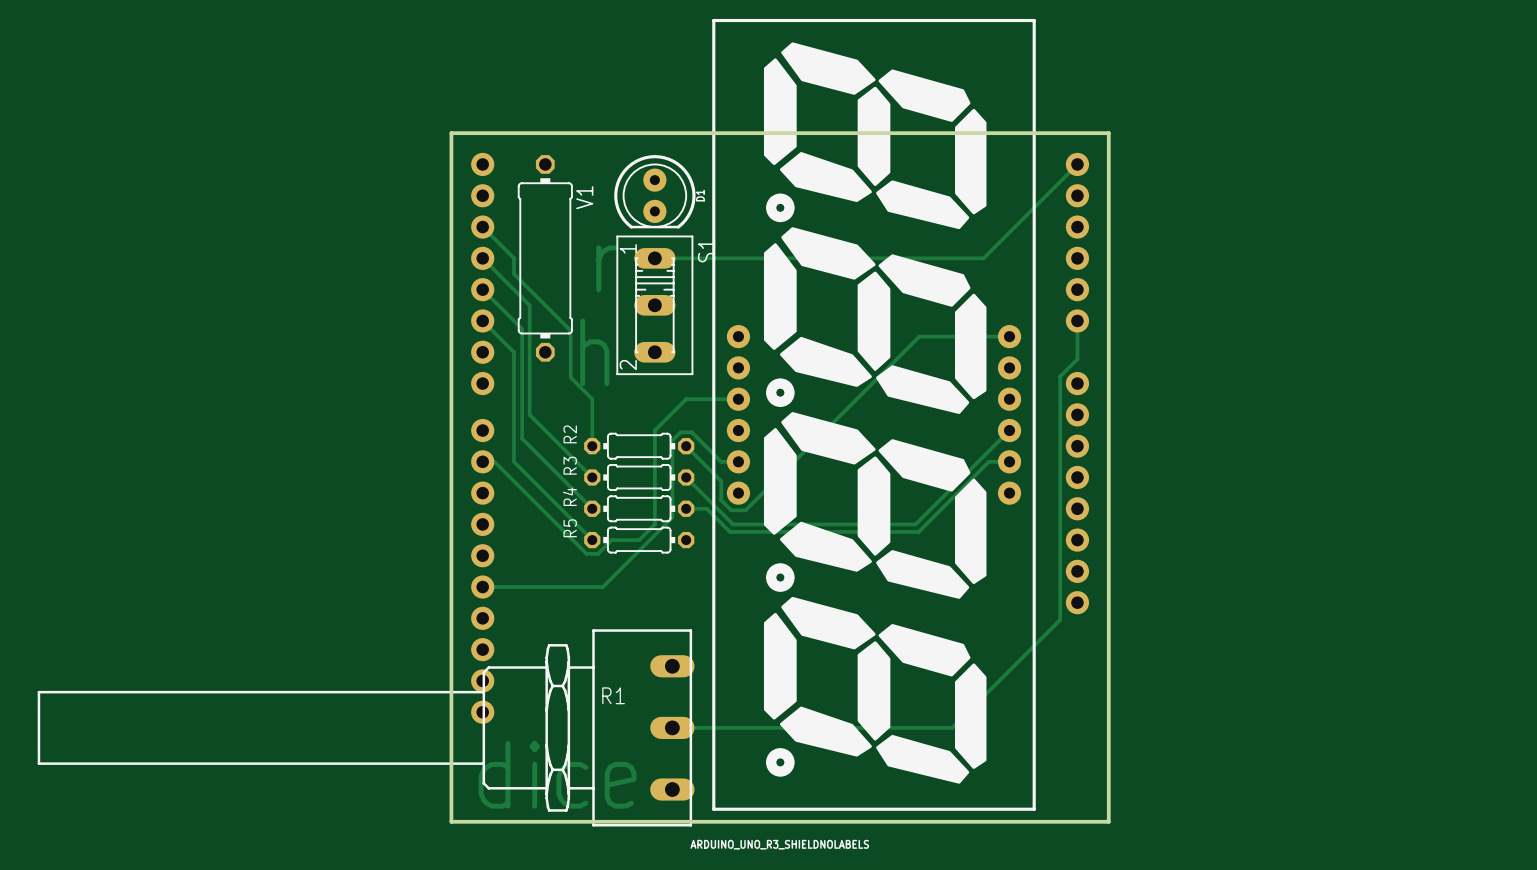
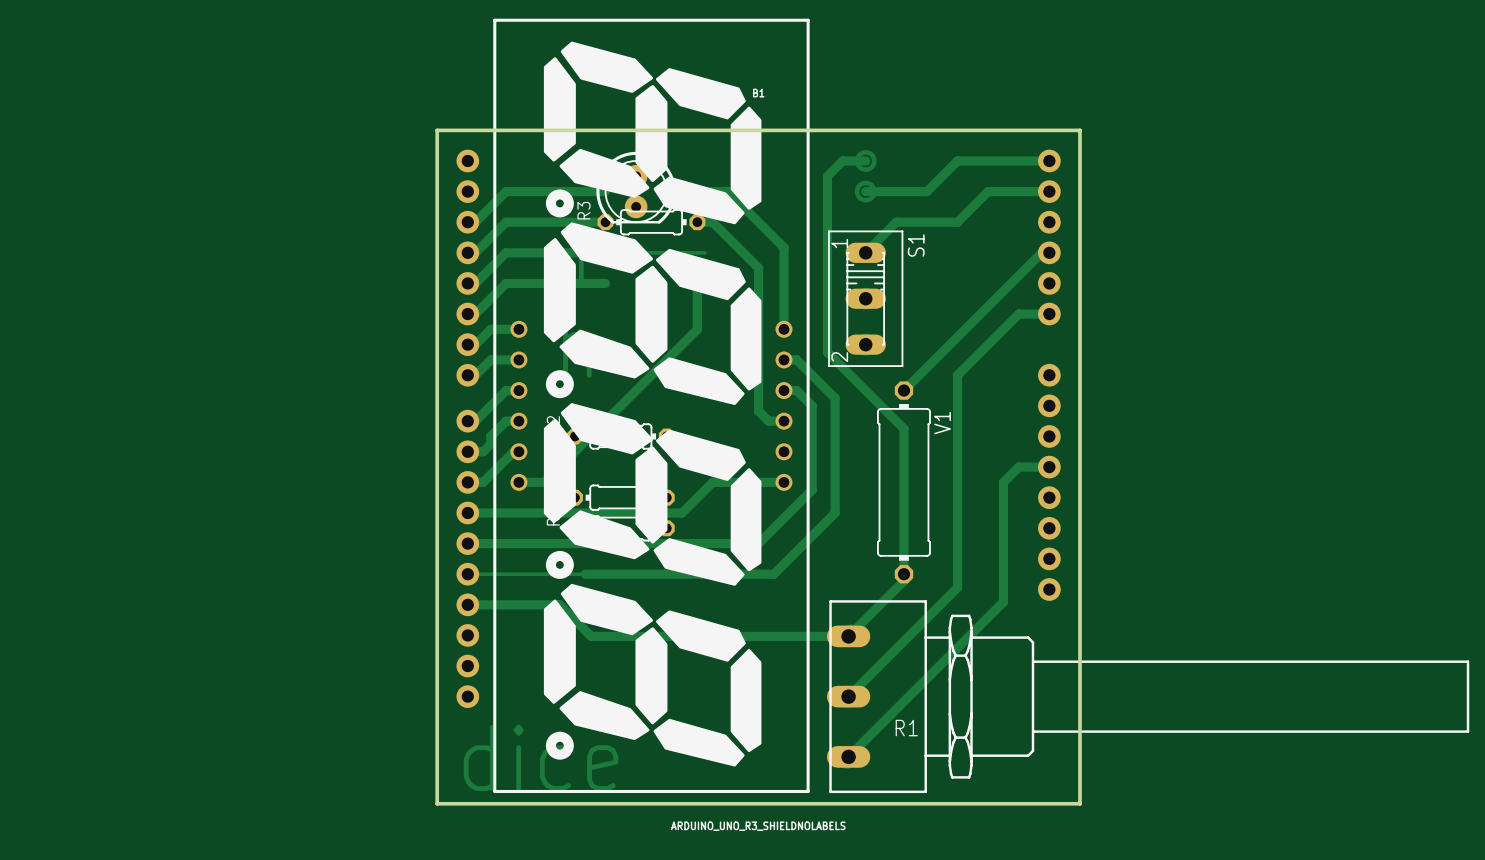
drawing: none -> [854, 150, 877, 203]
track: none -> (865, 160) (842, 160) (827, 176) (827, 352) (903, 428) (903, 581) (848, 636) (591, 636) (559, 604) (467, 604)
track: (1077, 164) (983, 258) (725, 258) -> (1049, 160) (957, 160) (926, 191) (865, 191)
track: none -> (697, 191) (727, 191) (784, 247) (784, 329)
track: none -> (1049, 191) (988, 191) (957, 222) (896, 222) (865, 252)
track: (482, 227) (514, 258) (514, 274) (570, 330) (570, 377) (592, 399) (592, 446) -> (467, 222) (475, 222) (506, 191) (605, 191)
track: none -> (697, 222) (712, 222) (758, 268) (758, 411) (768, 421) (784, 421)
track: (482, 258) (529, 305) (529, 414) (592, 477) -> (467, 252) (475, 252) (506, 222) (605, 222)
V1 position: (545, 258) -> (903, 482)
track: none -> (1049, 252) (1041, 252) (903, 390)
track: (482, 289) (522, 329) (522, 438) (592, 508) -> (467, 283) (475, 283) (506, 252) (605, 252)
track: none -> (697, 283) (697, 329) (544, 482) (518, 482)
S1 position: (654, 305) -> (865, 298)
track: (482, 320) (514, 352) (514, 461) (592, 540) -> (467, 314) (475, 314) (506, 283) (605, 283)
track: (1077, 320) (1077, 359) (1060, 376) (1060, 619) (952, 727) (672, 727) -> (1049, 314) (1018, 314) (957, 375) (957, 587) (848, 696)
track: none -> (518, 329) (490, 329) (475, 344) (467, 344)
track: (1009, 336) (919, 336) (745, 510) (731, 510) (721, 500) (721, 481) (686, 446) -> none
track: none -> (518, 359) (490, 359) (475, 375) (467, 375)
track: none -> (518, 390) (506, 390) (475, 421) (467, 421)
track: (738, 399) (686, 399) (654, 430) (654, 524) (639, 540) (611, 540) (597, 553) (586, 553) (494, 461) -> (518, 421) (506, 421) (490, 436) (490, 444) (483, 451) (479, 451)
track: none -> (784, 390) (796, 390) (812, 405) (812, 490) (758, 543) (467, 543)
part: none -> (651, 405)
part: (873, 414) -> none
track: (1009, 430) (915, 524) (733, 524) (686, 477) -> none
track: none -> (518, 451) (513, 451) (483, 482) (467, 482)
track: (738, 461) (721, 461) (691, 432) (680, 432) (672, 440) (672, 517) (602, 587) -> (784, 359) (796, 359) (835, 398) (835, 512) (773, 574) (585, 574)
track: (1009, 461) (988, 461) (918, 531) (730, 531) (706, 508) (686, 508) -> none
R3 position: (639, 477) -> (651, 222)
track: none -> (1049, 467) (1018, 467) (1003, 482) (1003, 602) (848, 756)
track: none -> (784, 482) (712, 482) (682, 512) (467, 512)
R1 rotation: 0° (366, 727) -> 180° (1148, 696)
R1 position: (366, 727) -> (1148, 696)

